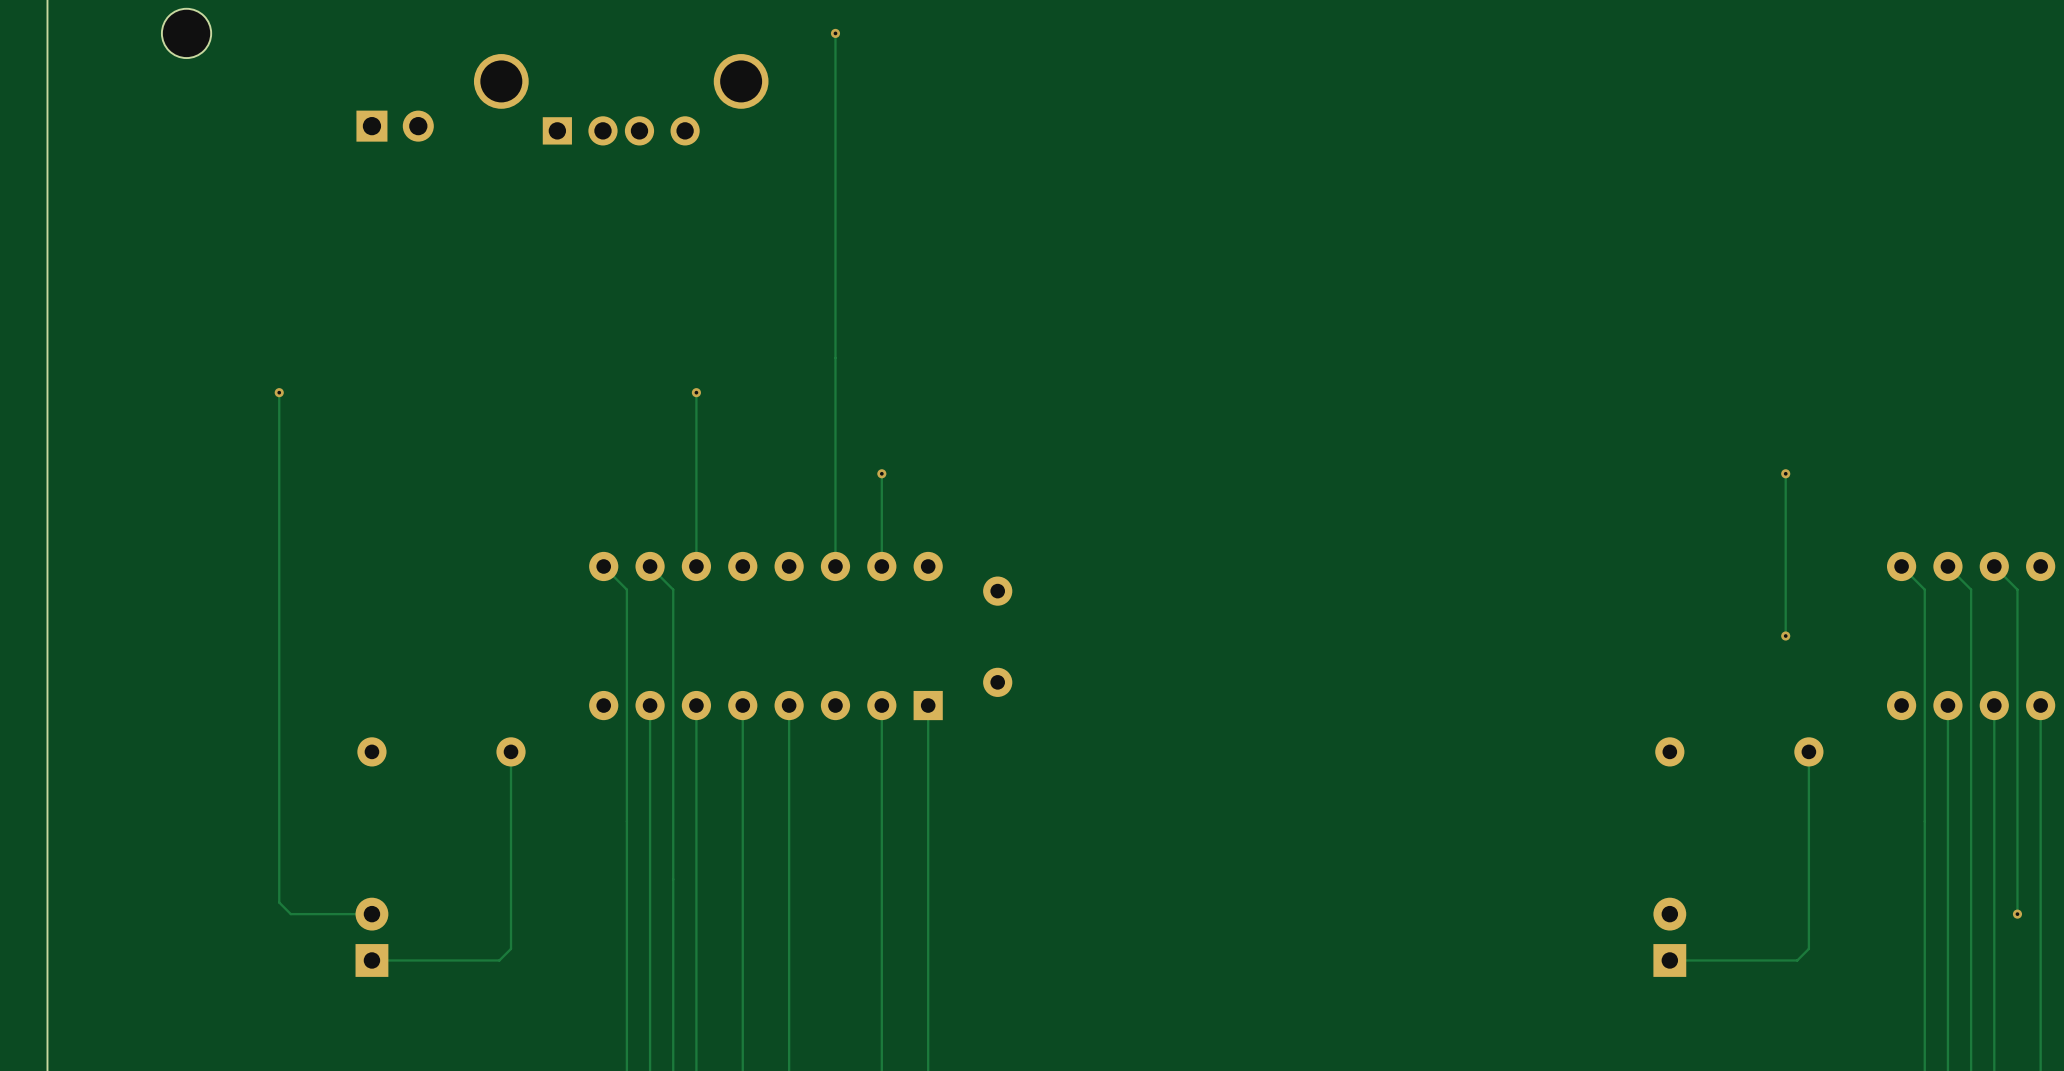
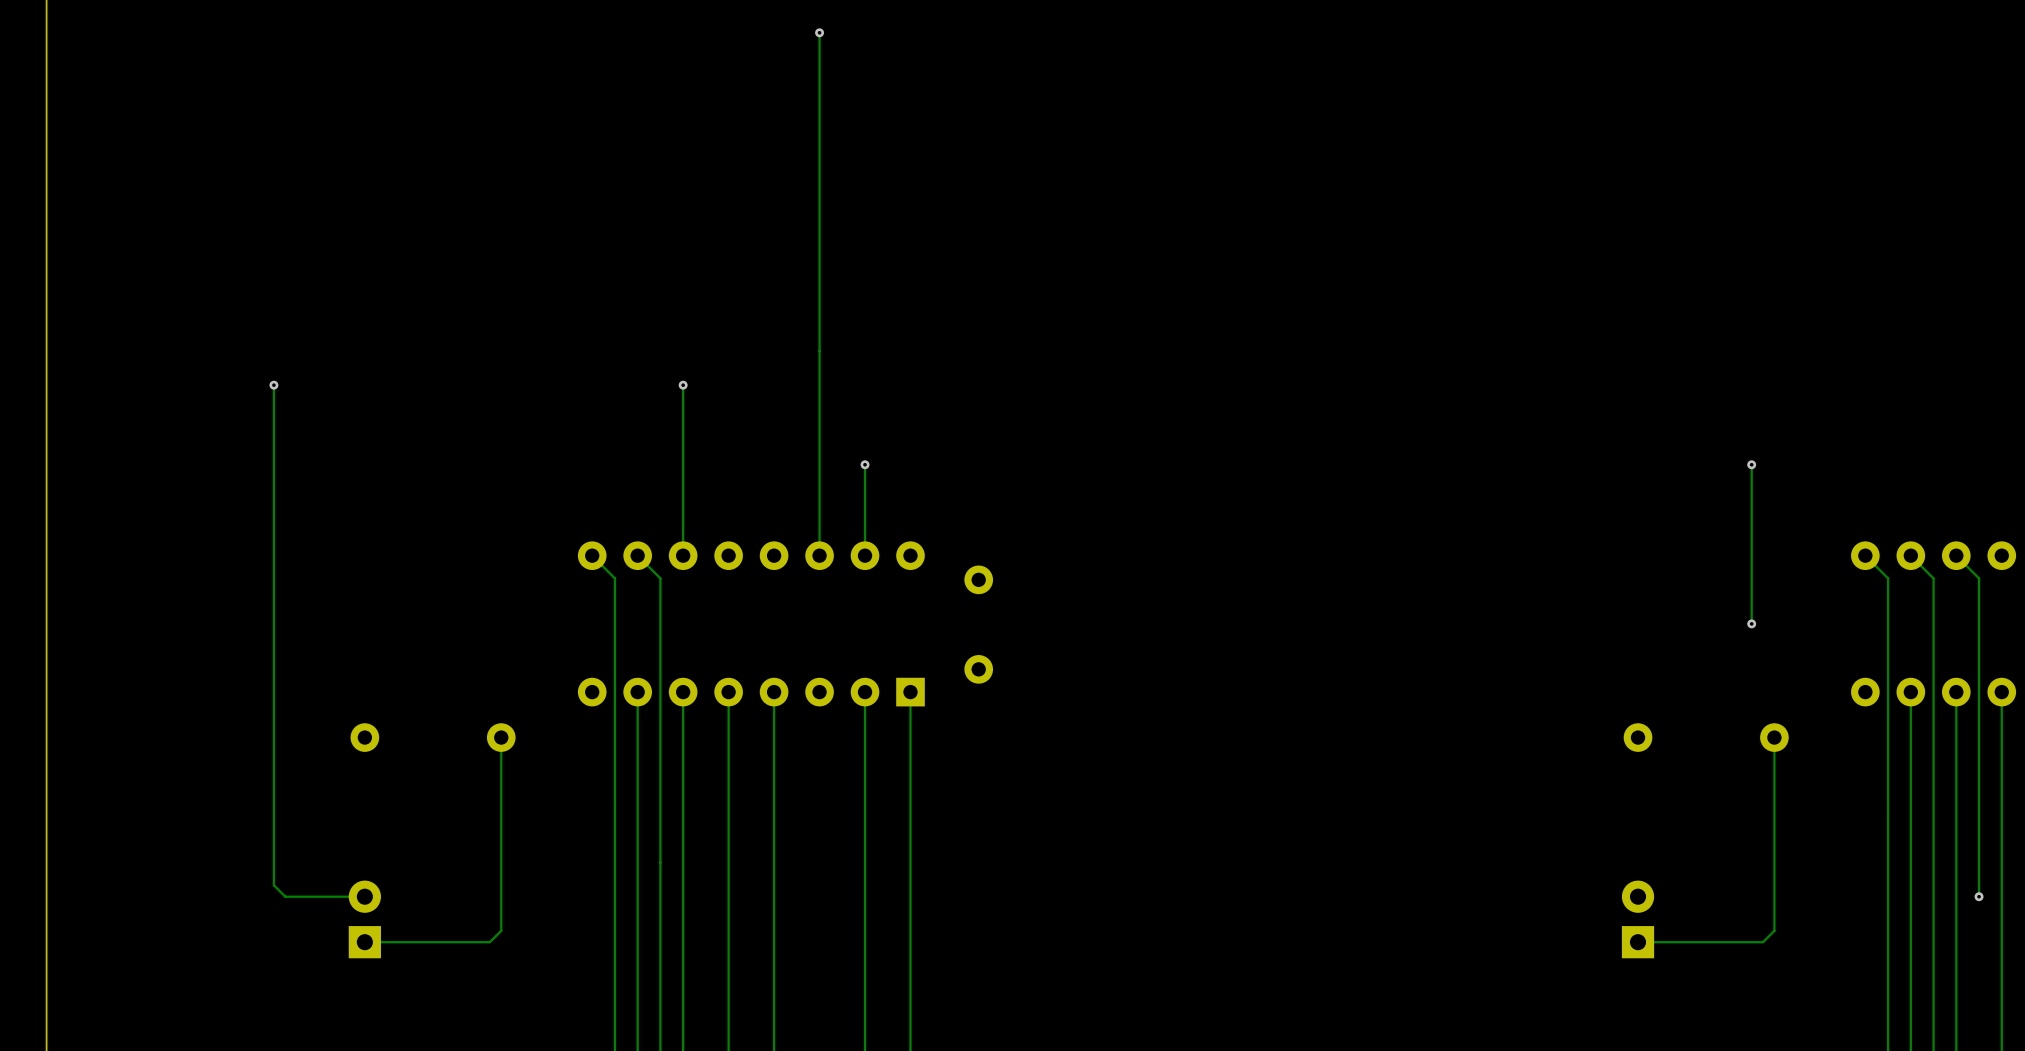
part: (186, 33) -> none
part: (621, 99) -> none
part: (395, 126) -> none

